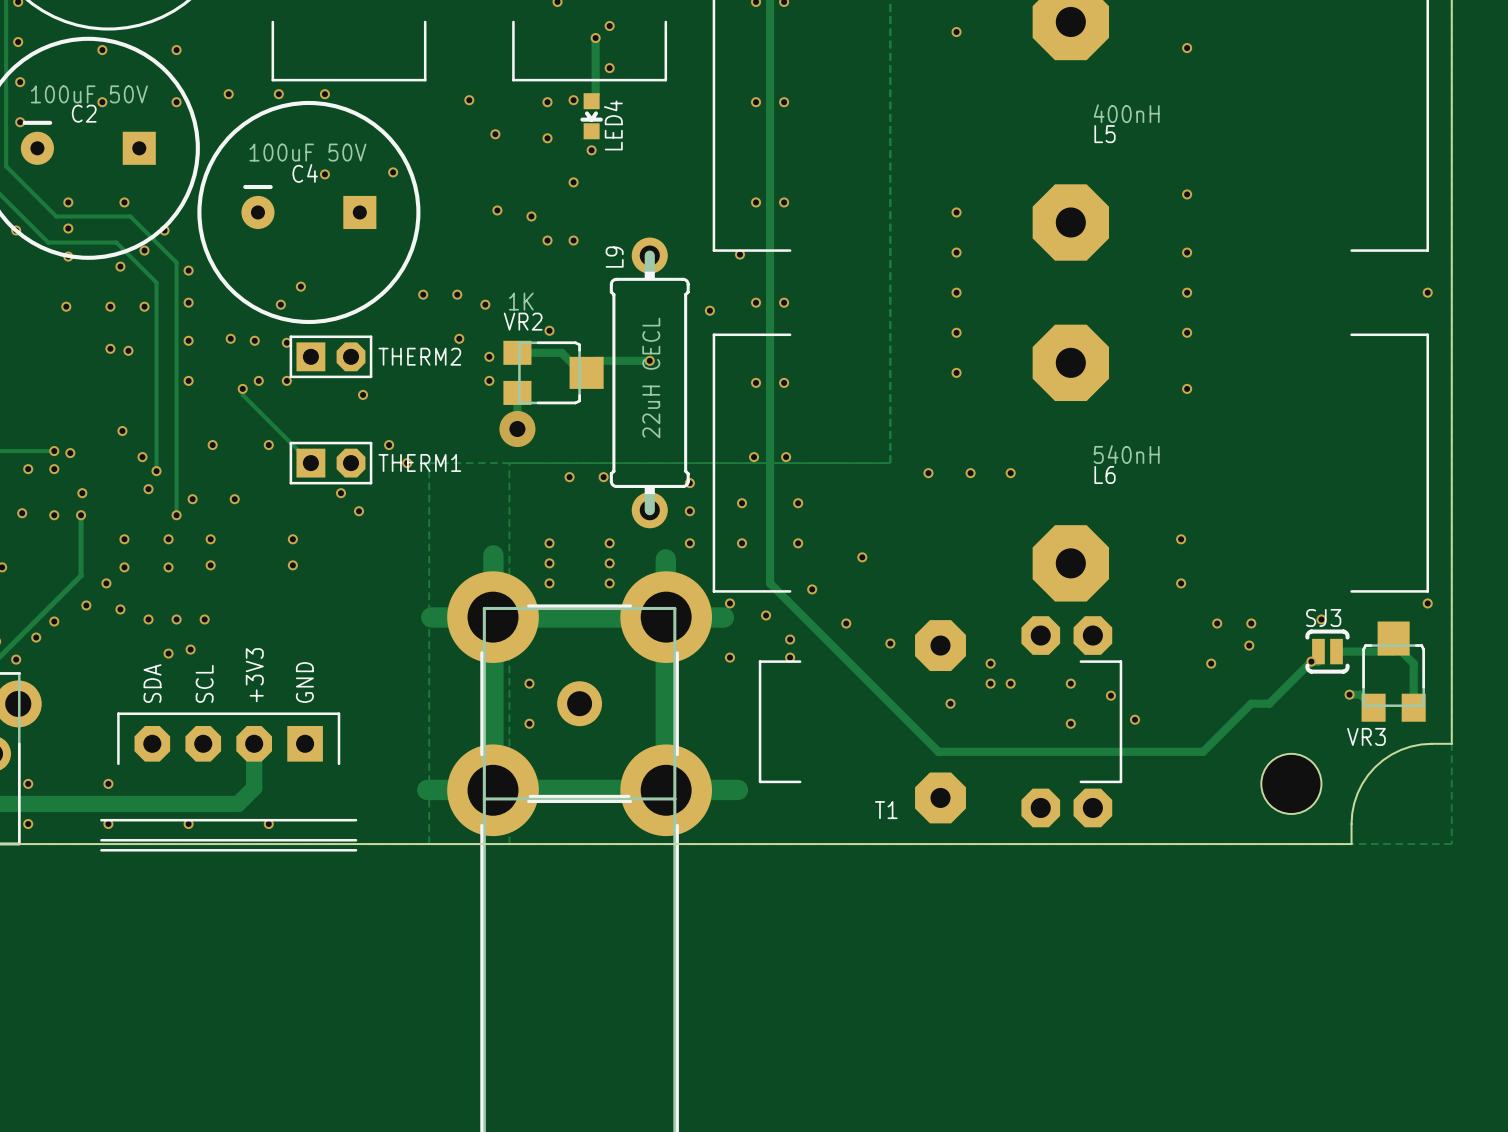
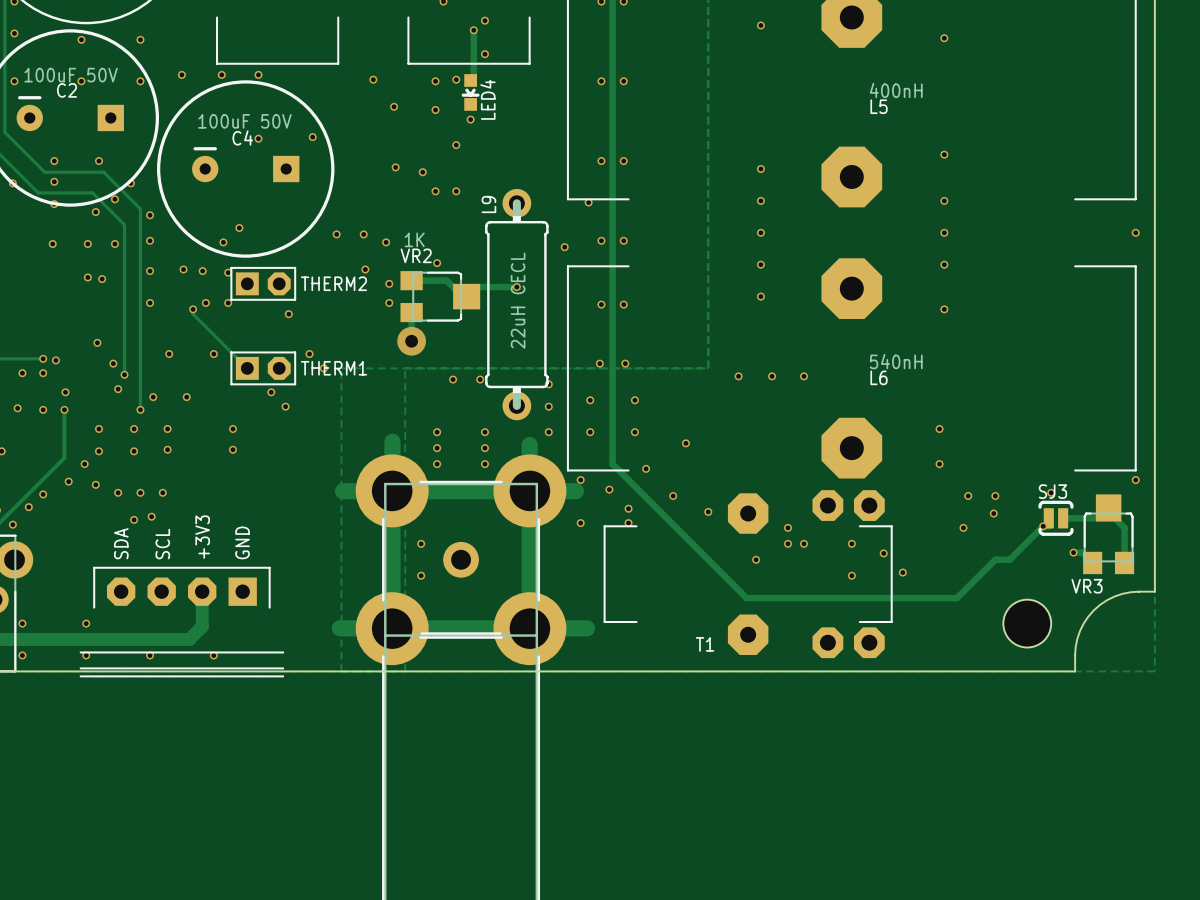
via: (20, 82) -> none
via: none -> (14, 81)
via: (20, 122) -> none

